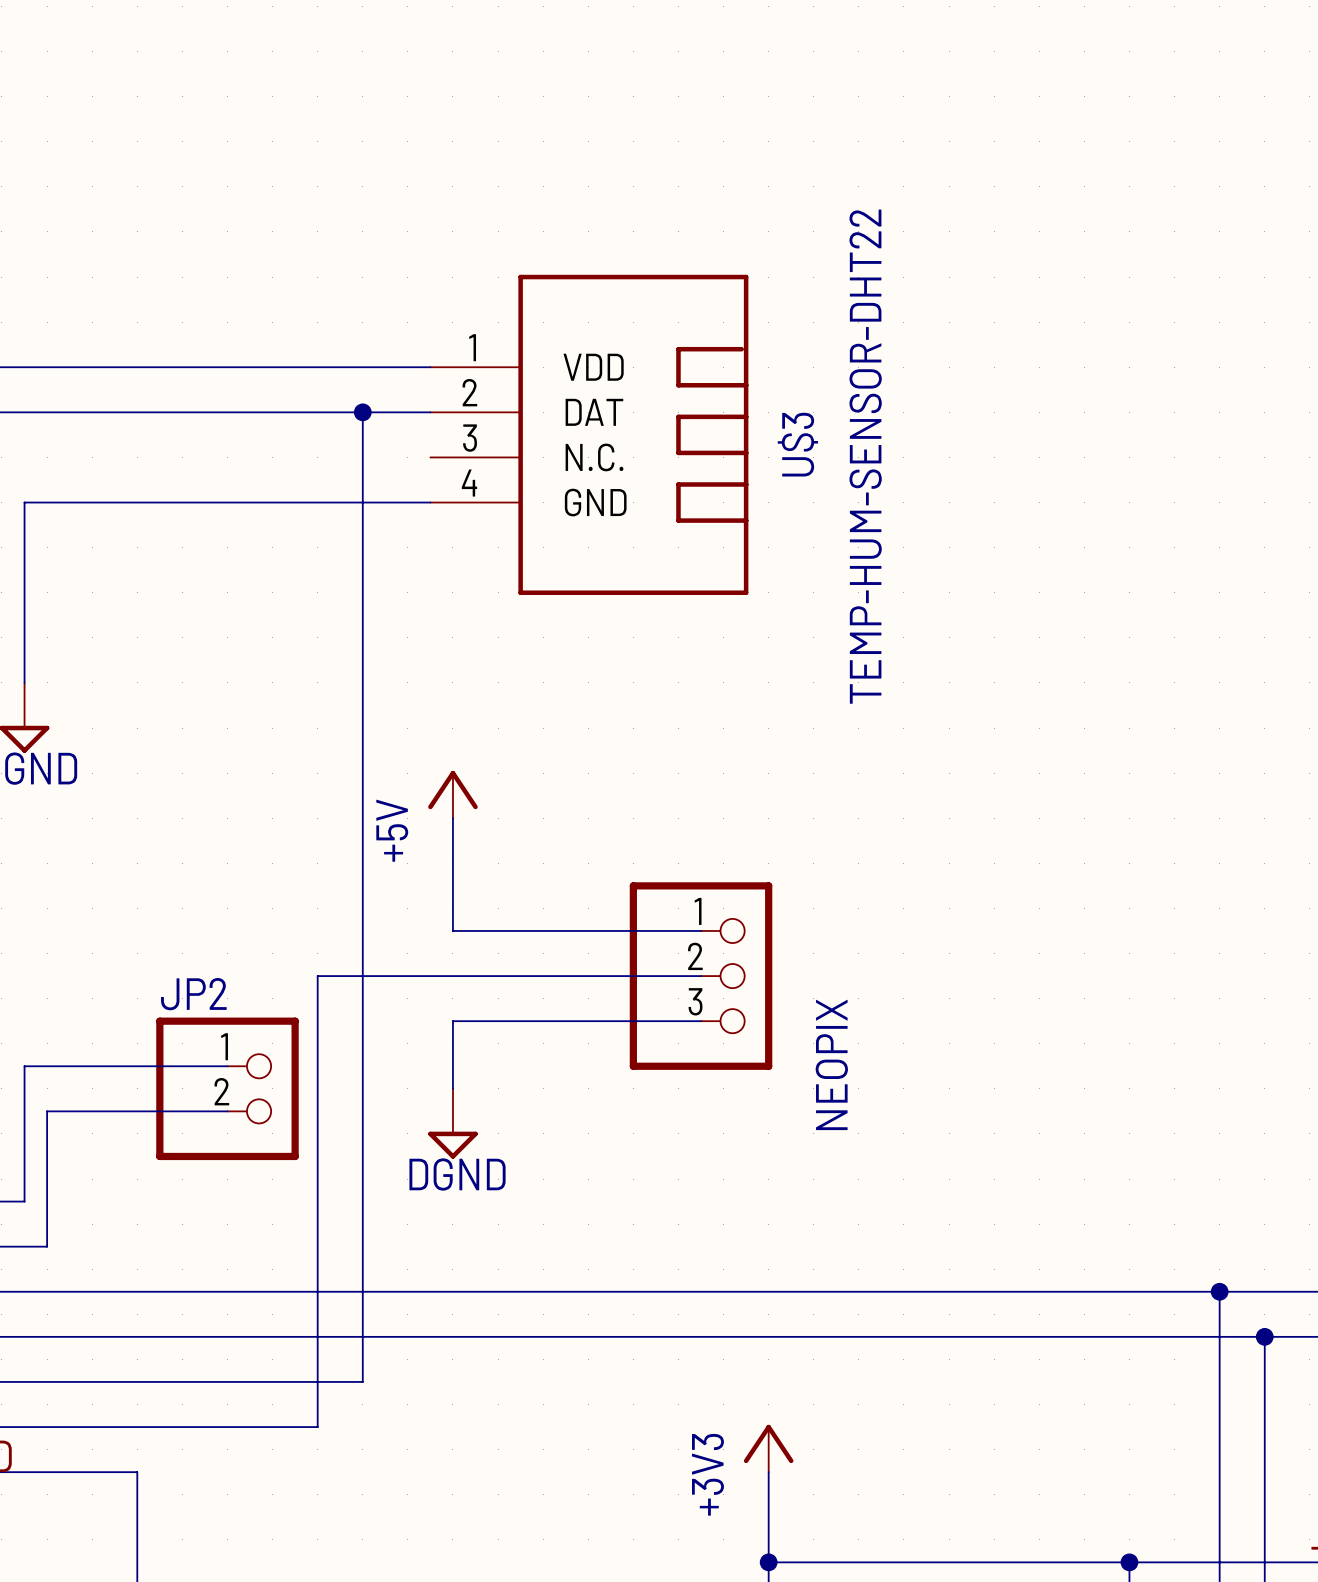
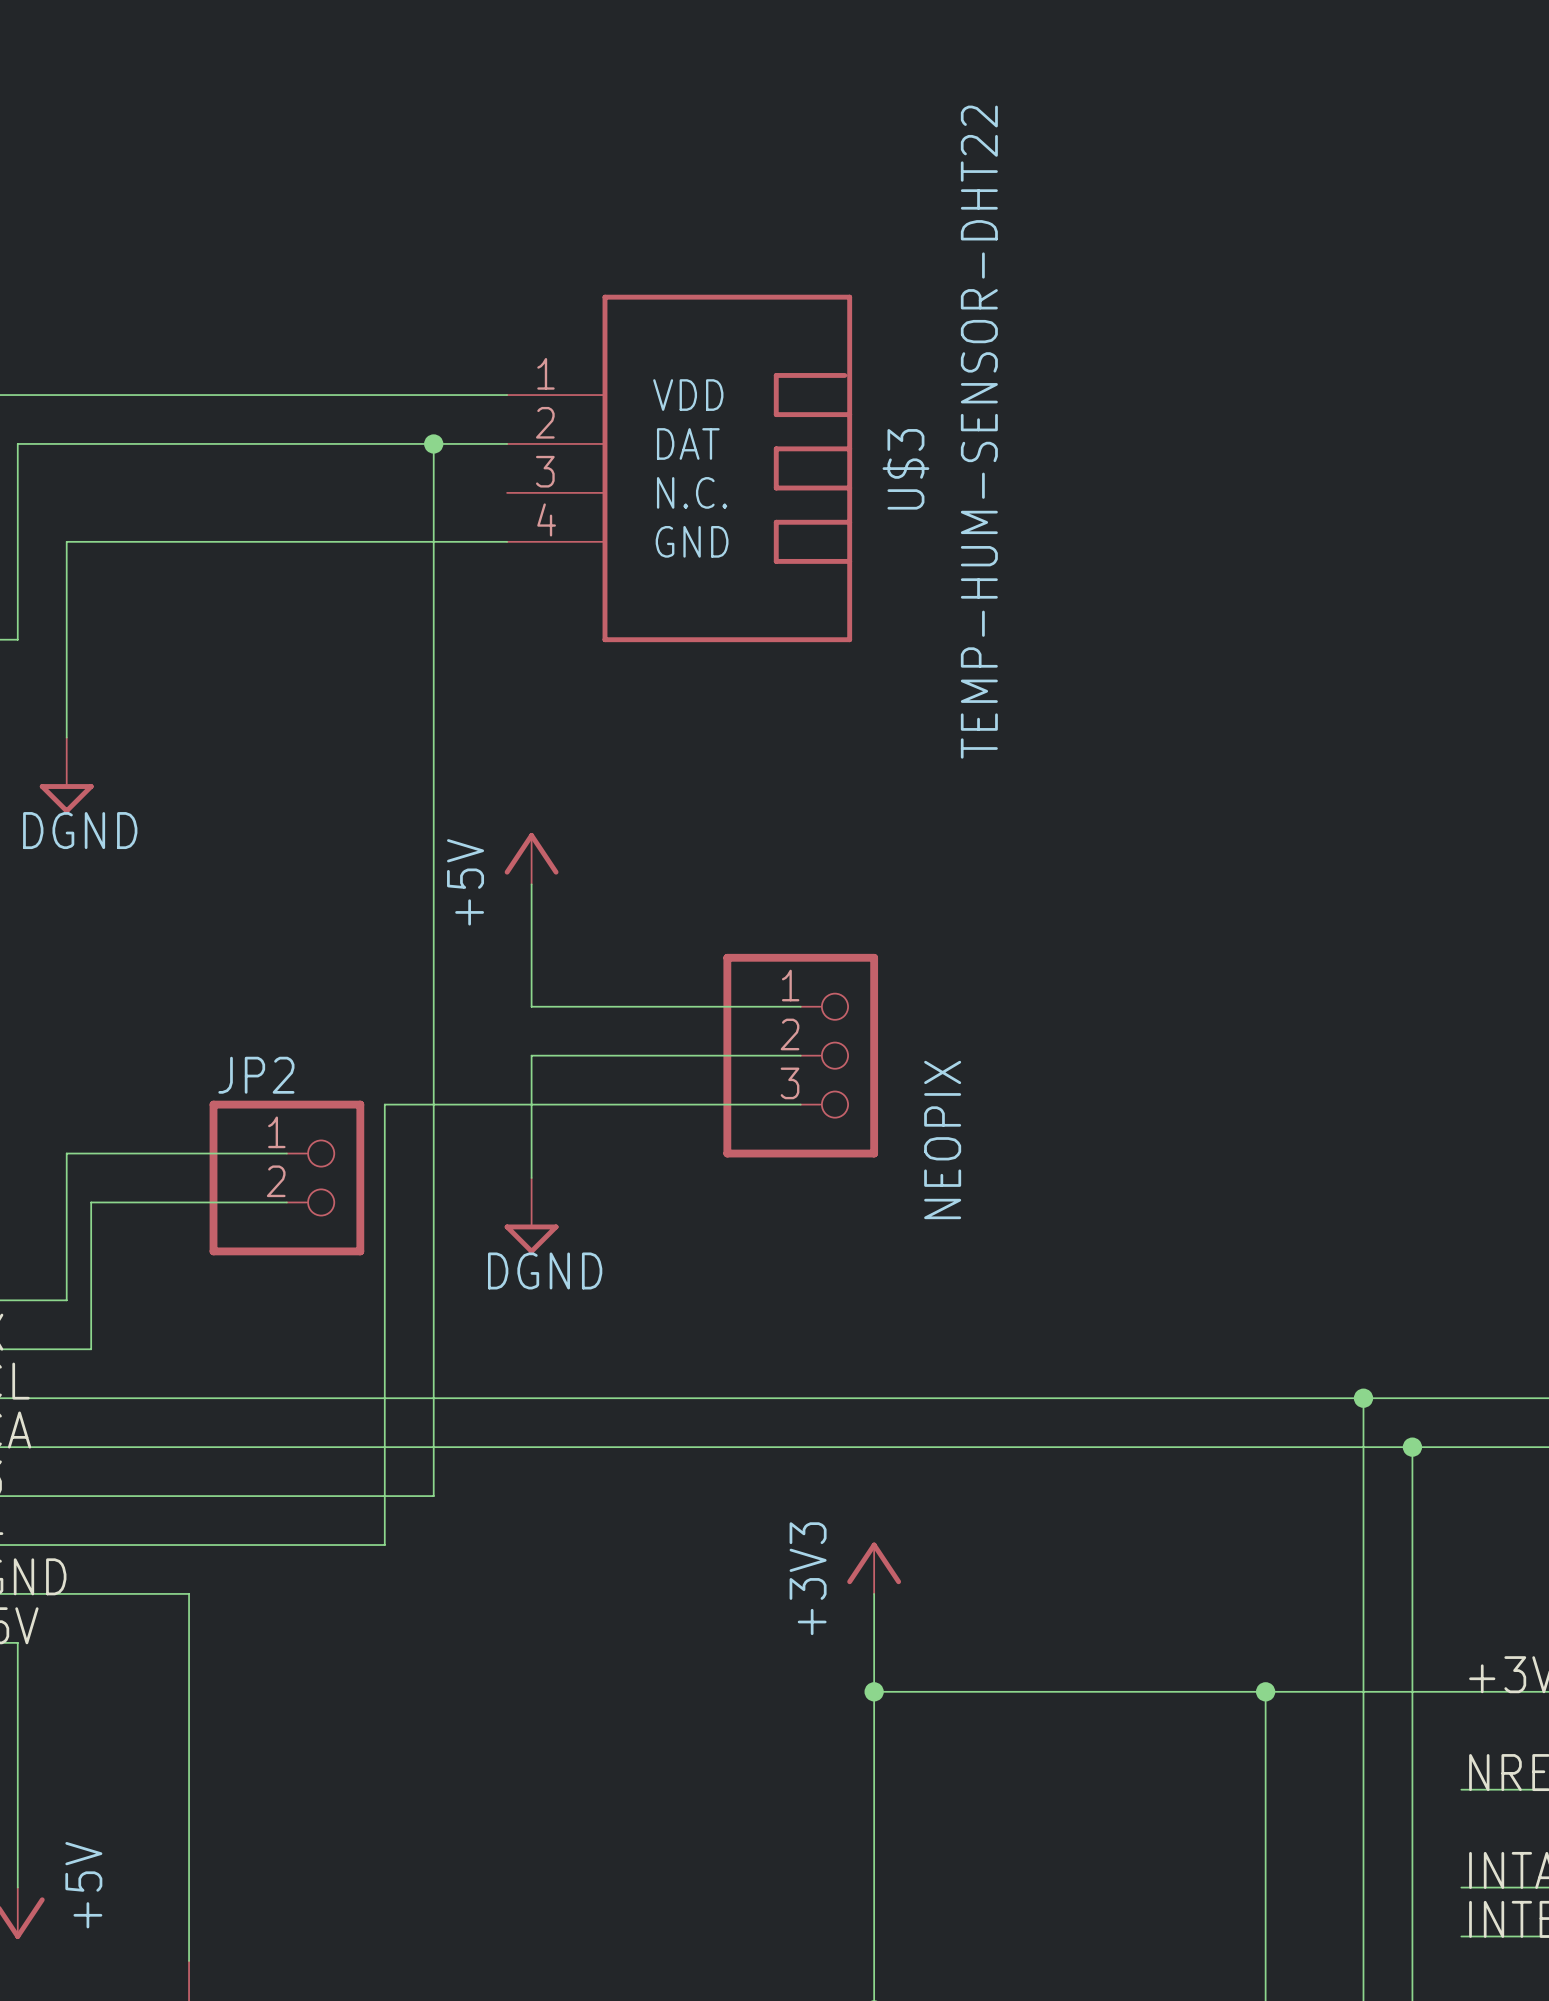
wire: (452, 976) (317, 976) (317, 1021) -> (531, 1055) (531, 1104) (384, 1104)

